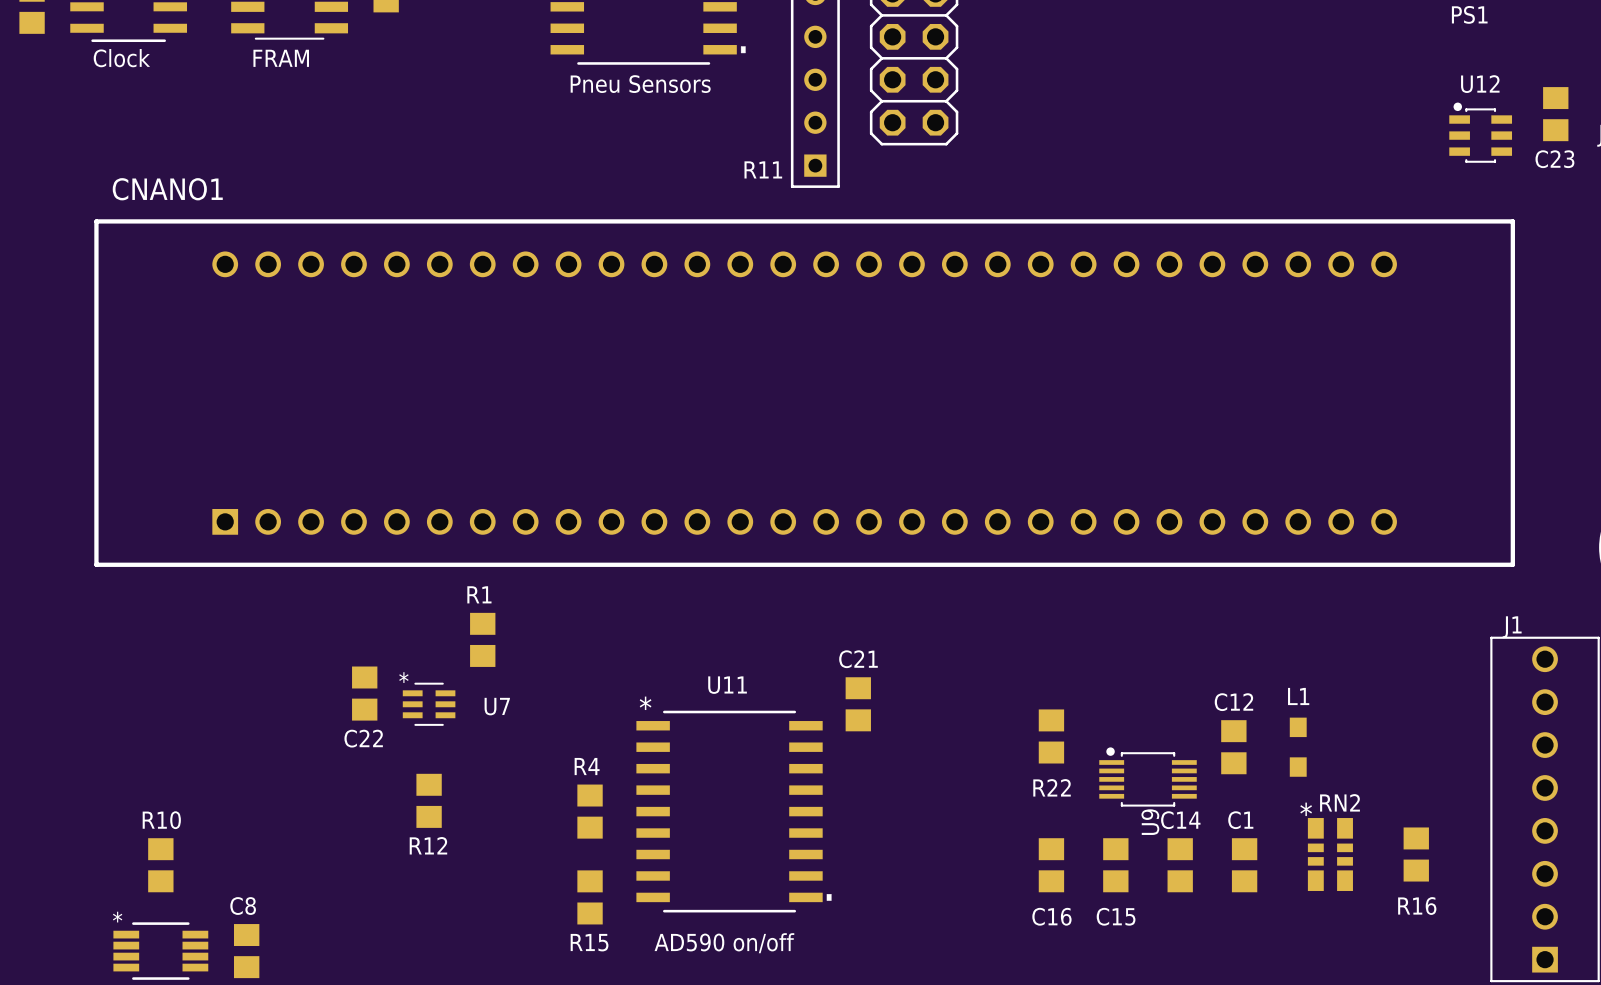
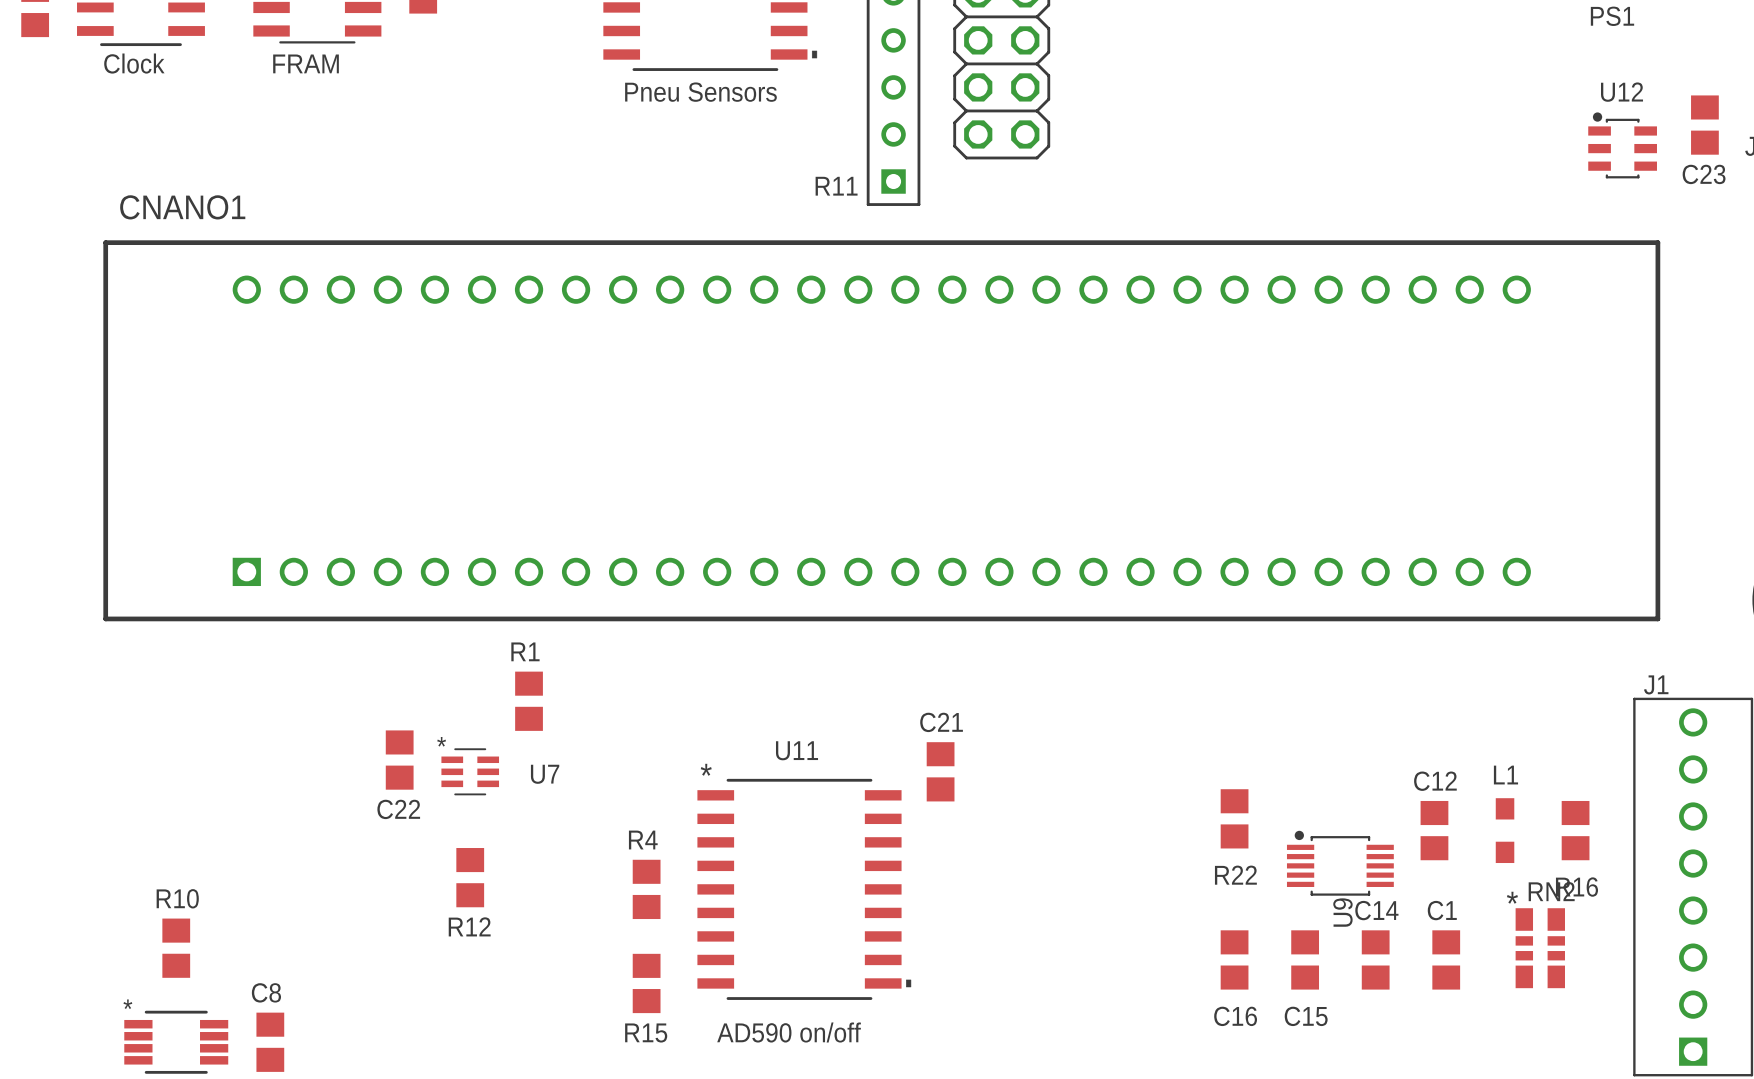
R22 position: (1051, 736) -> (1234, 818)
C12 position: (1233, 747) -> (1434, 830)
L1 position: (1298, 747) -> (1505, 830)
U9 position: (1148, 776) -> (1340, 863)
RN2 position: (1330, 854) -> (1540, 948)
R16 position: (1416, 854) -> (1575, 830)
C16 position: (1051, 865) -> (1234, 959)
C15 position: (1115, 865) -> (1305, 959)
C14 position: (1180, 865) -> (1375, 959)
C1 position: (1244, 865) -> (1446, 959)

